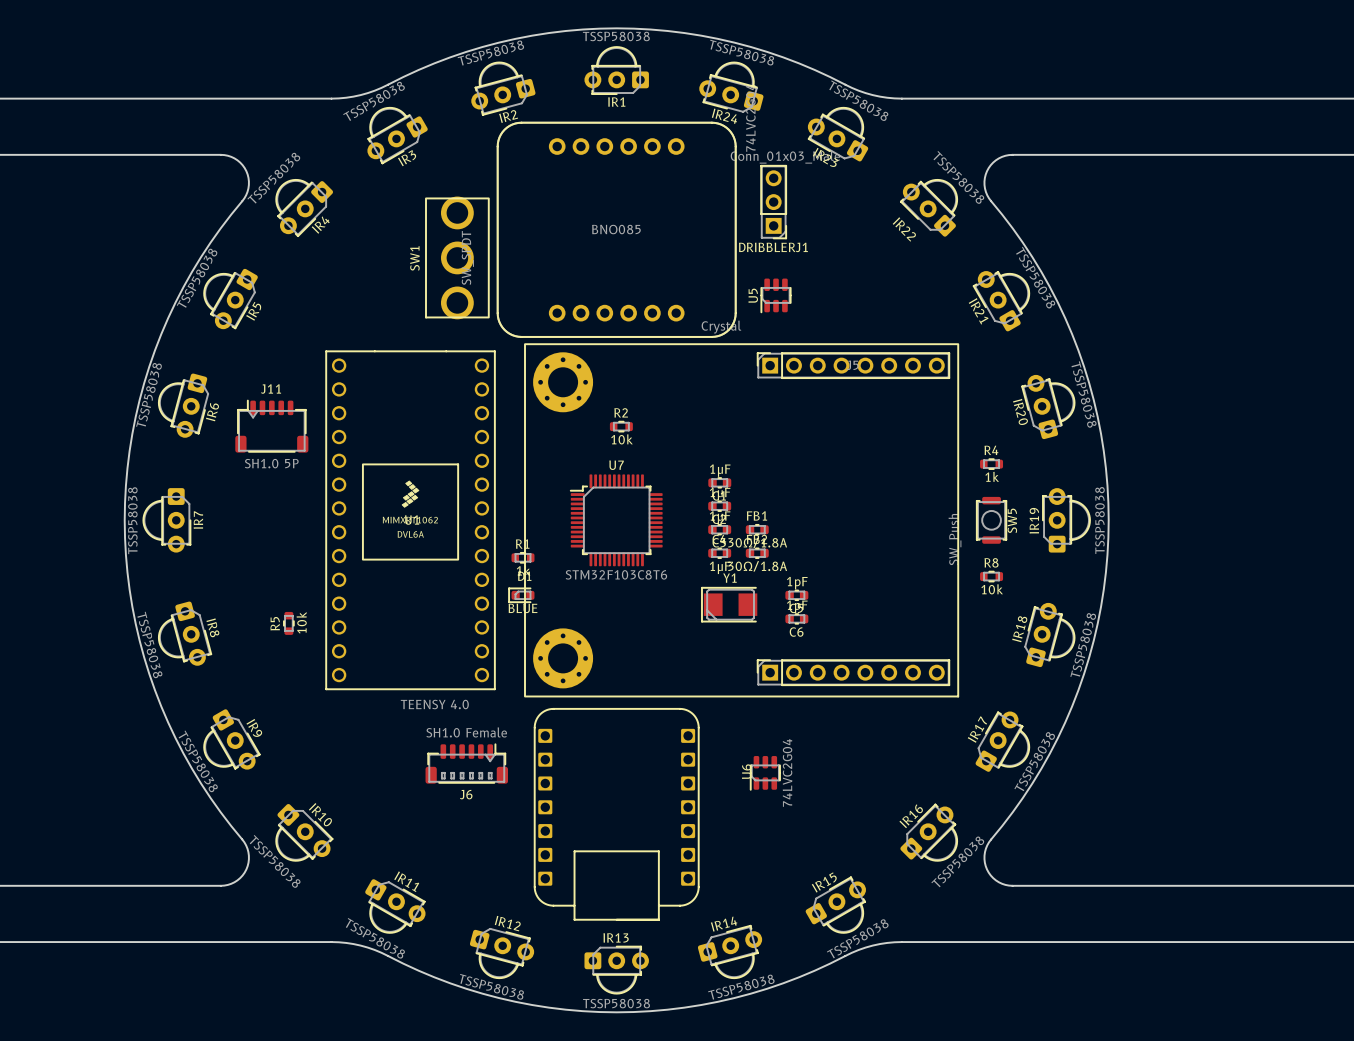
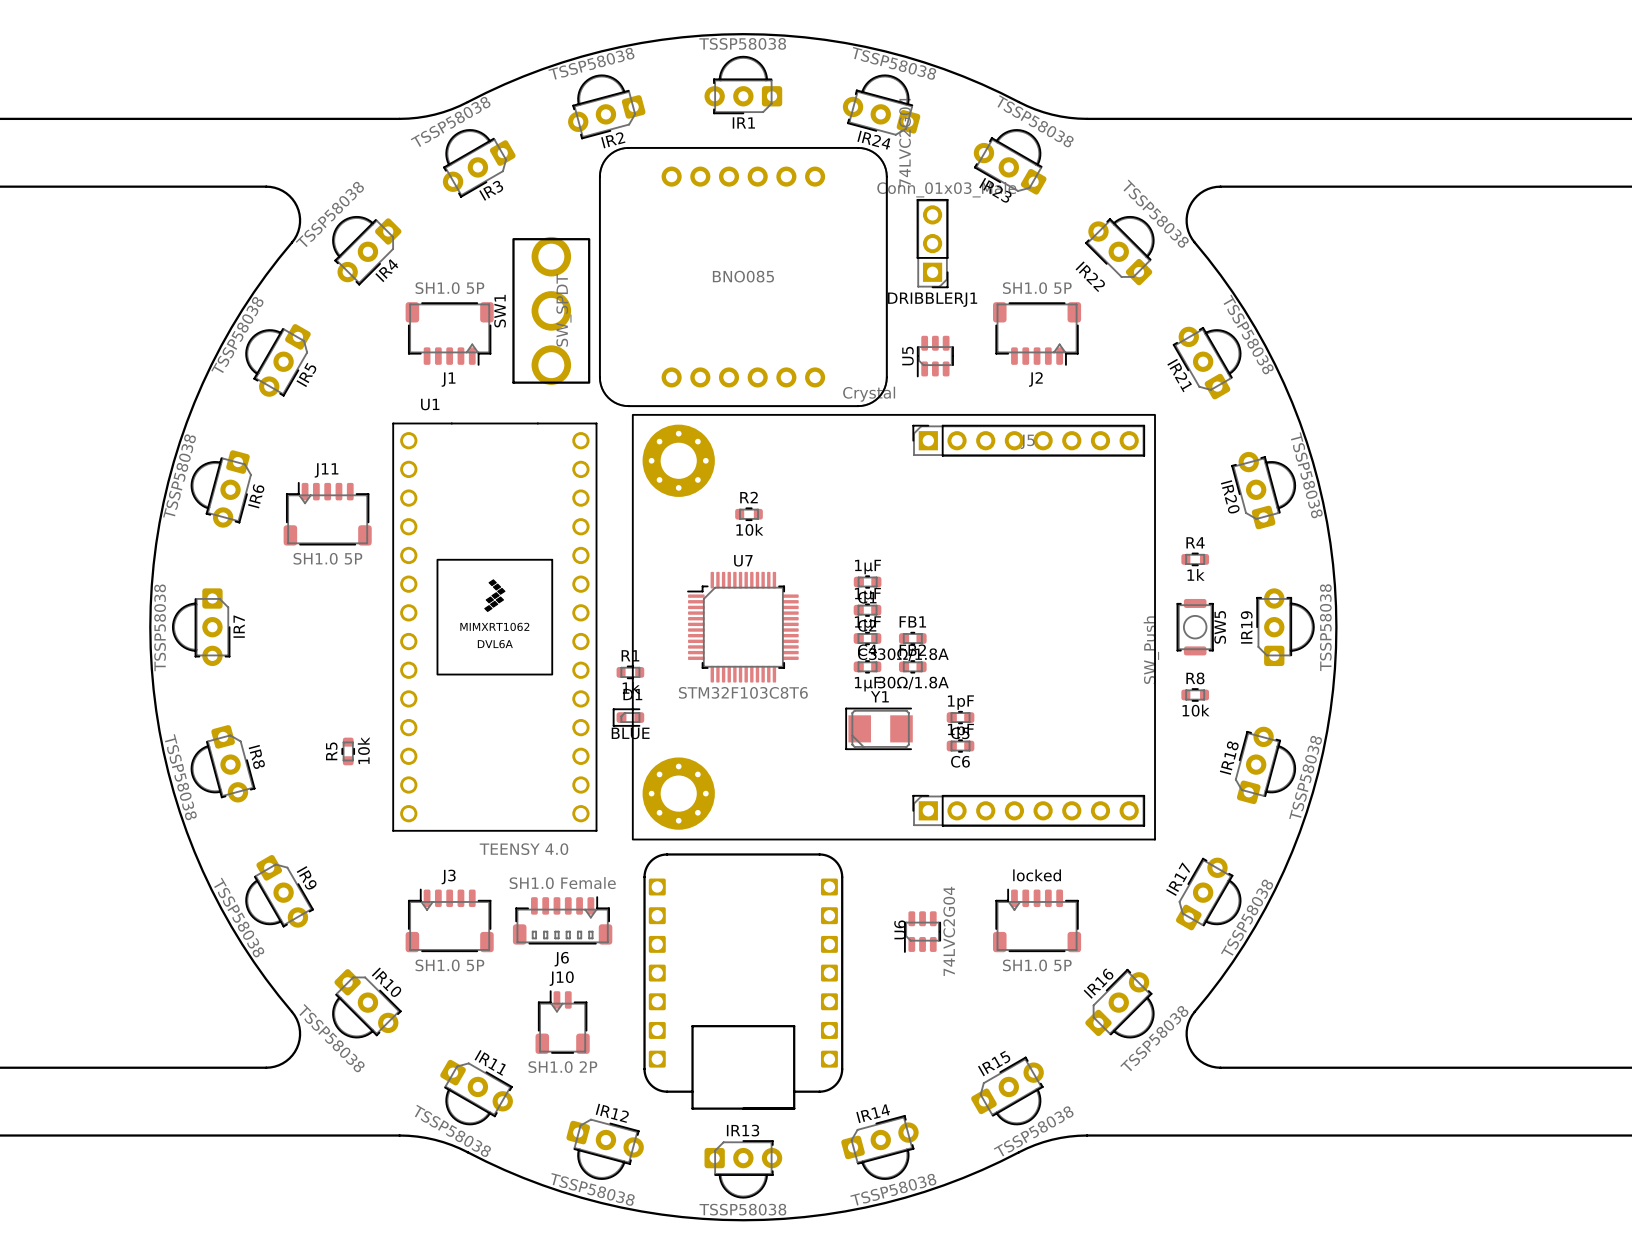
J1: none -> SH1.0 5P (449, 333)
J2: none -> SH1.0 5P (1037, 333)
U1 name position: U1 (412, 520) -> U1 (430, 404)
J3: none -> SH1.0 5P (449, 920)
locked: none -> SH1.0 5P (1037, 920)
J10: none -> SH1.0 2P (562, 1022)

